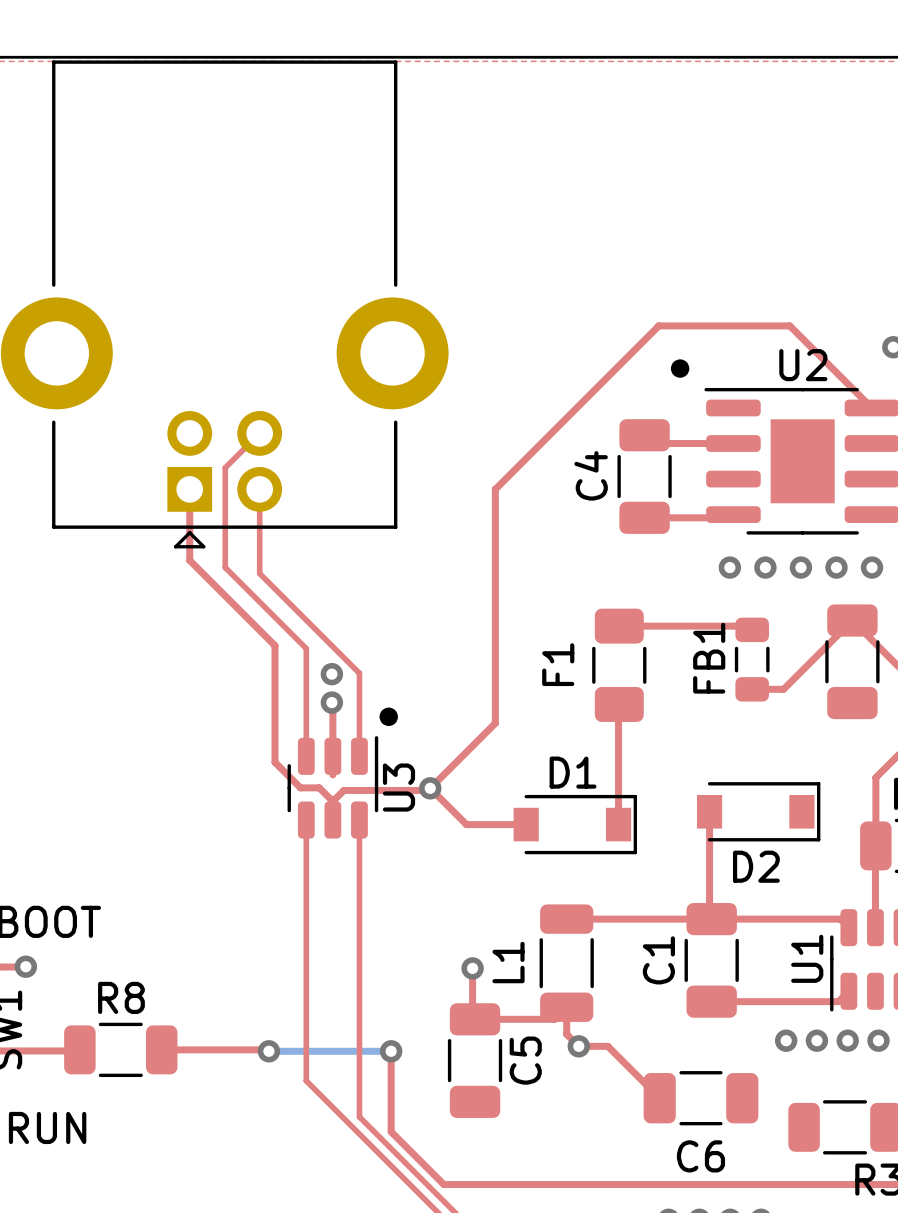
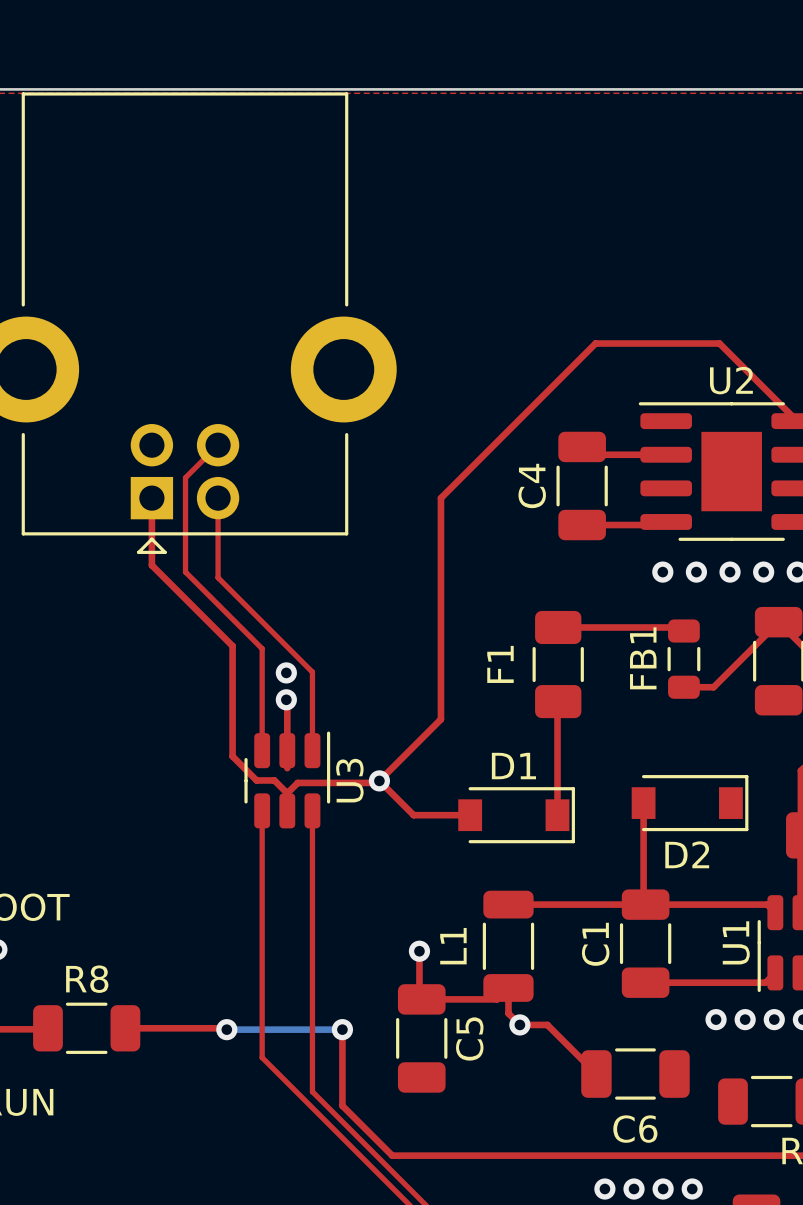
drawing: [670, 359, 690, 378] -> none
drawing: [379, 707, 398, 727] -> none

